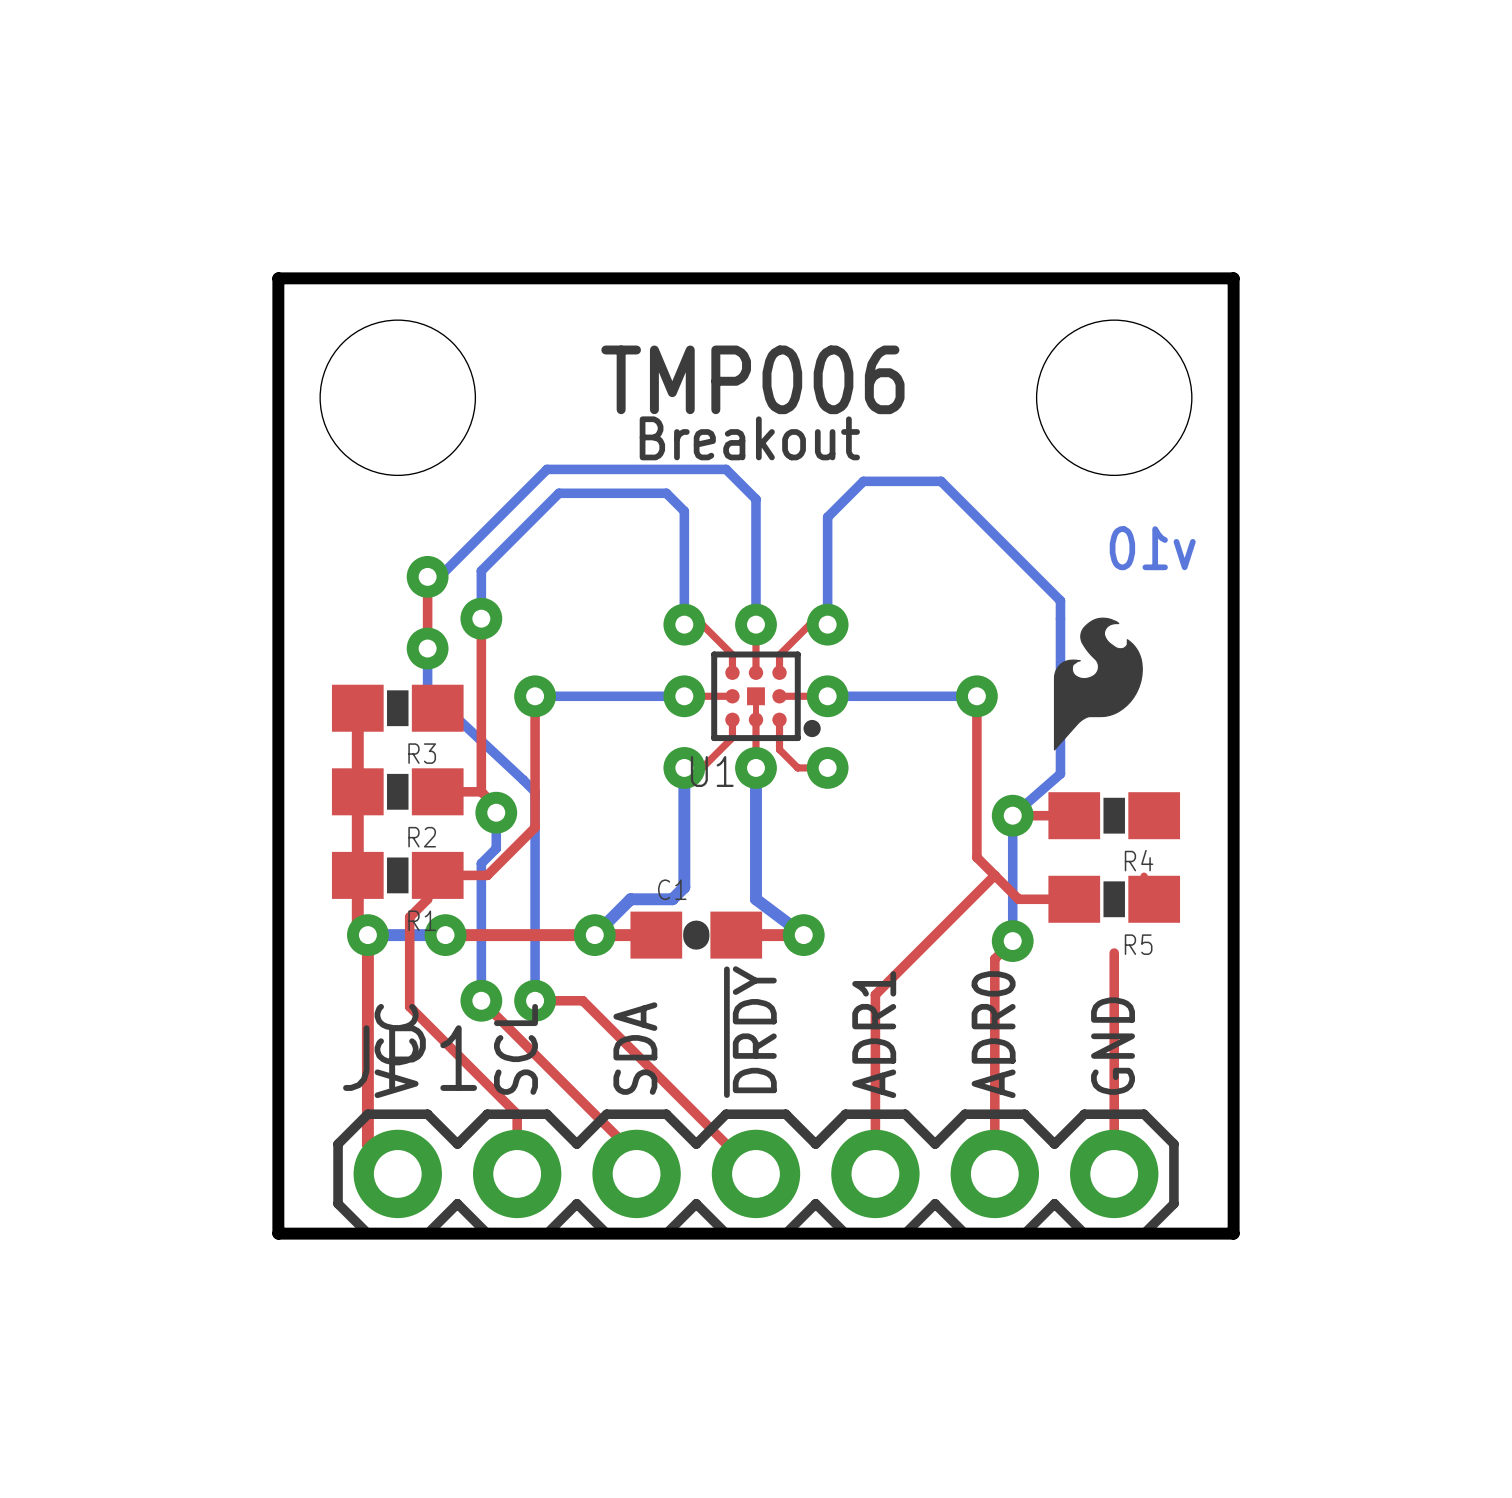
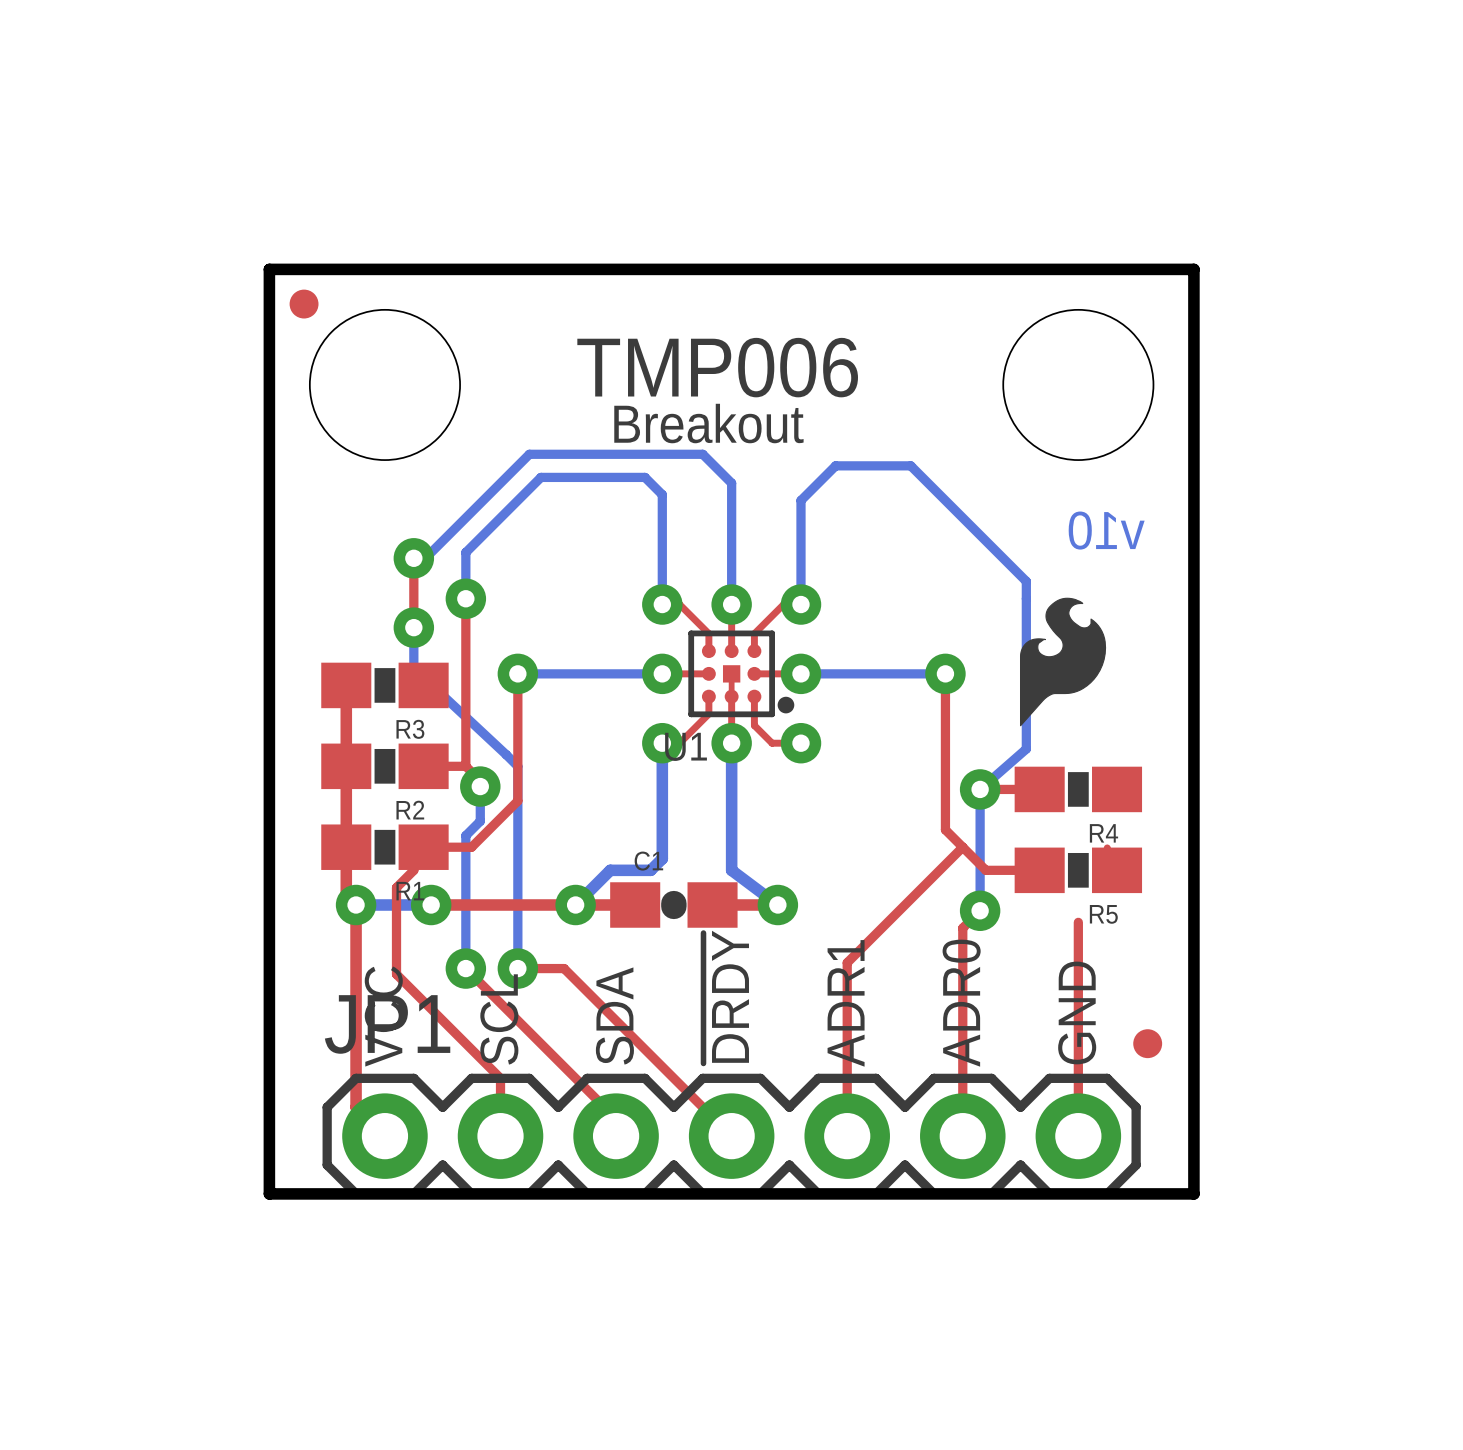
part: none -> (304, 304)
part: none -> (1147, 1043)

